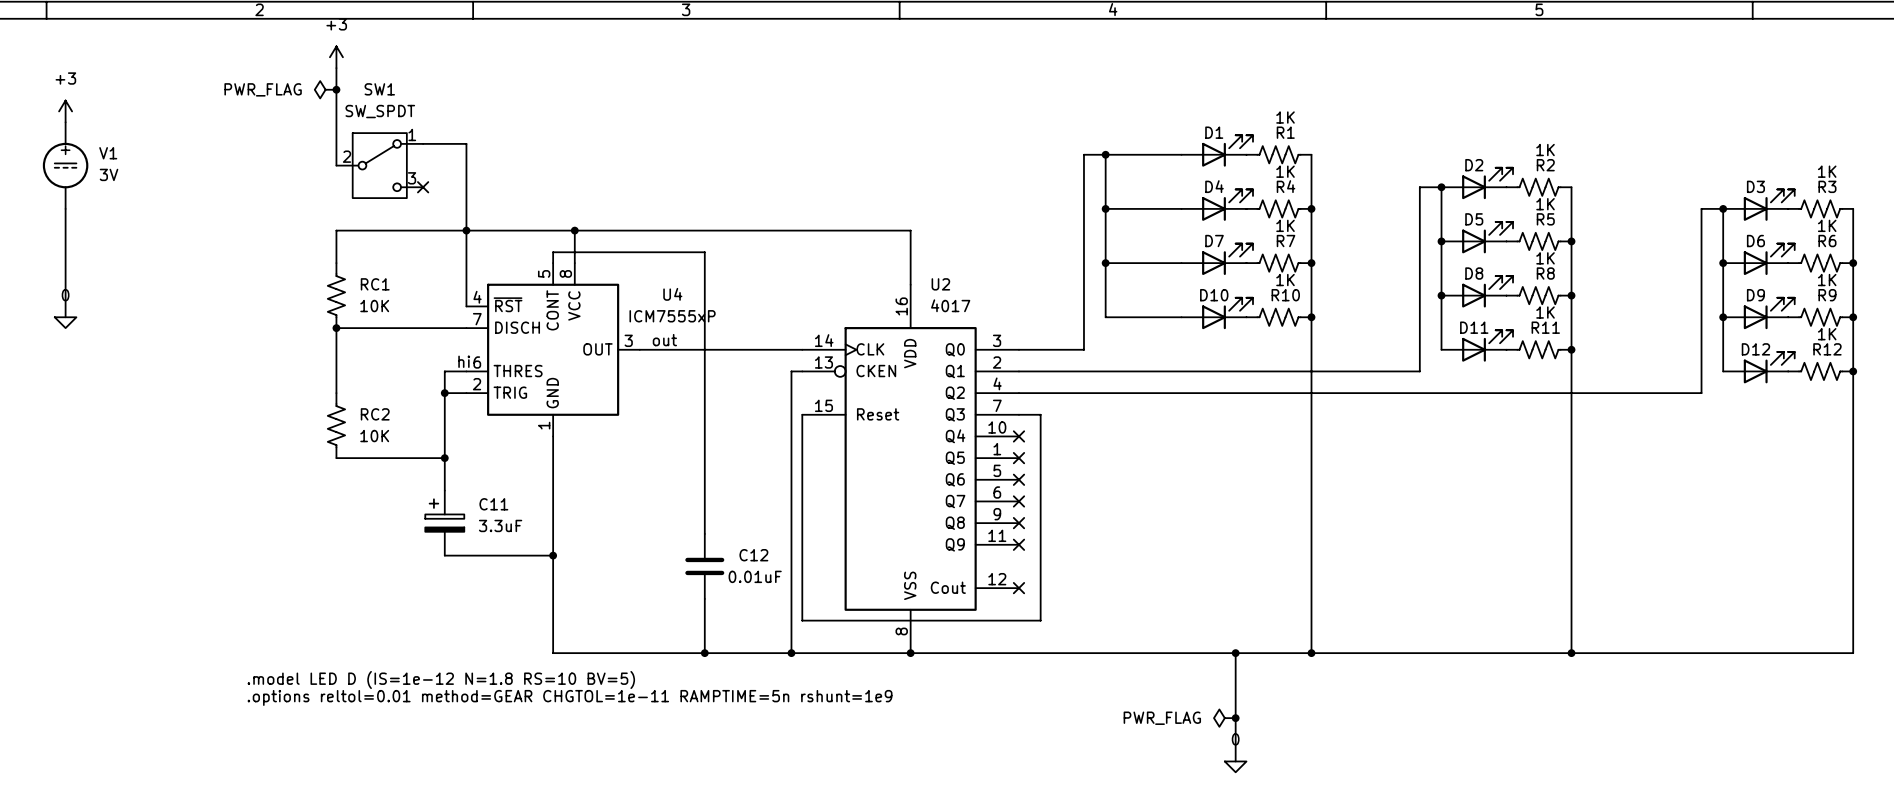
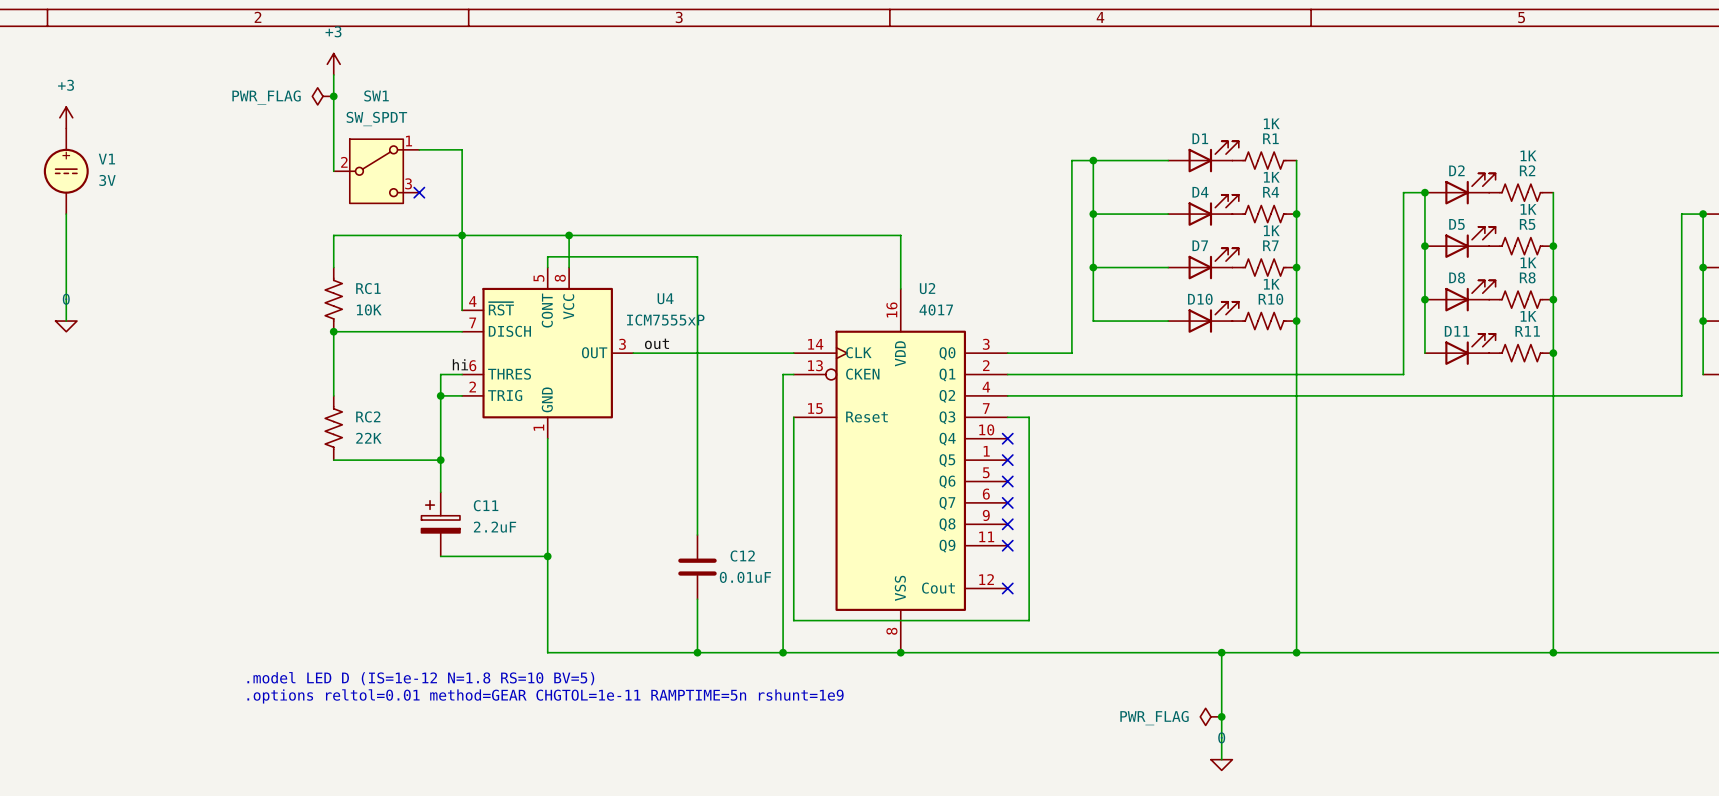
RC2 value: 10K (374, 436) -> 22K (368, 438)
C11 value: 3.3uF (500, 525) -> 2.2uF (495, 527)

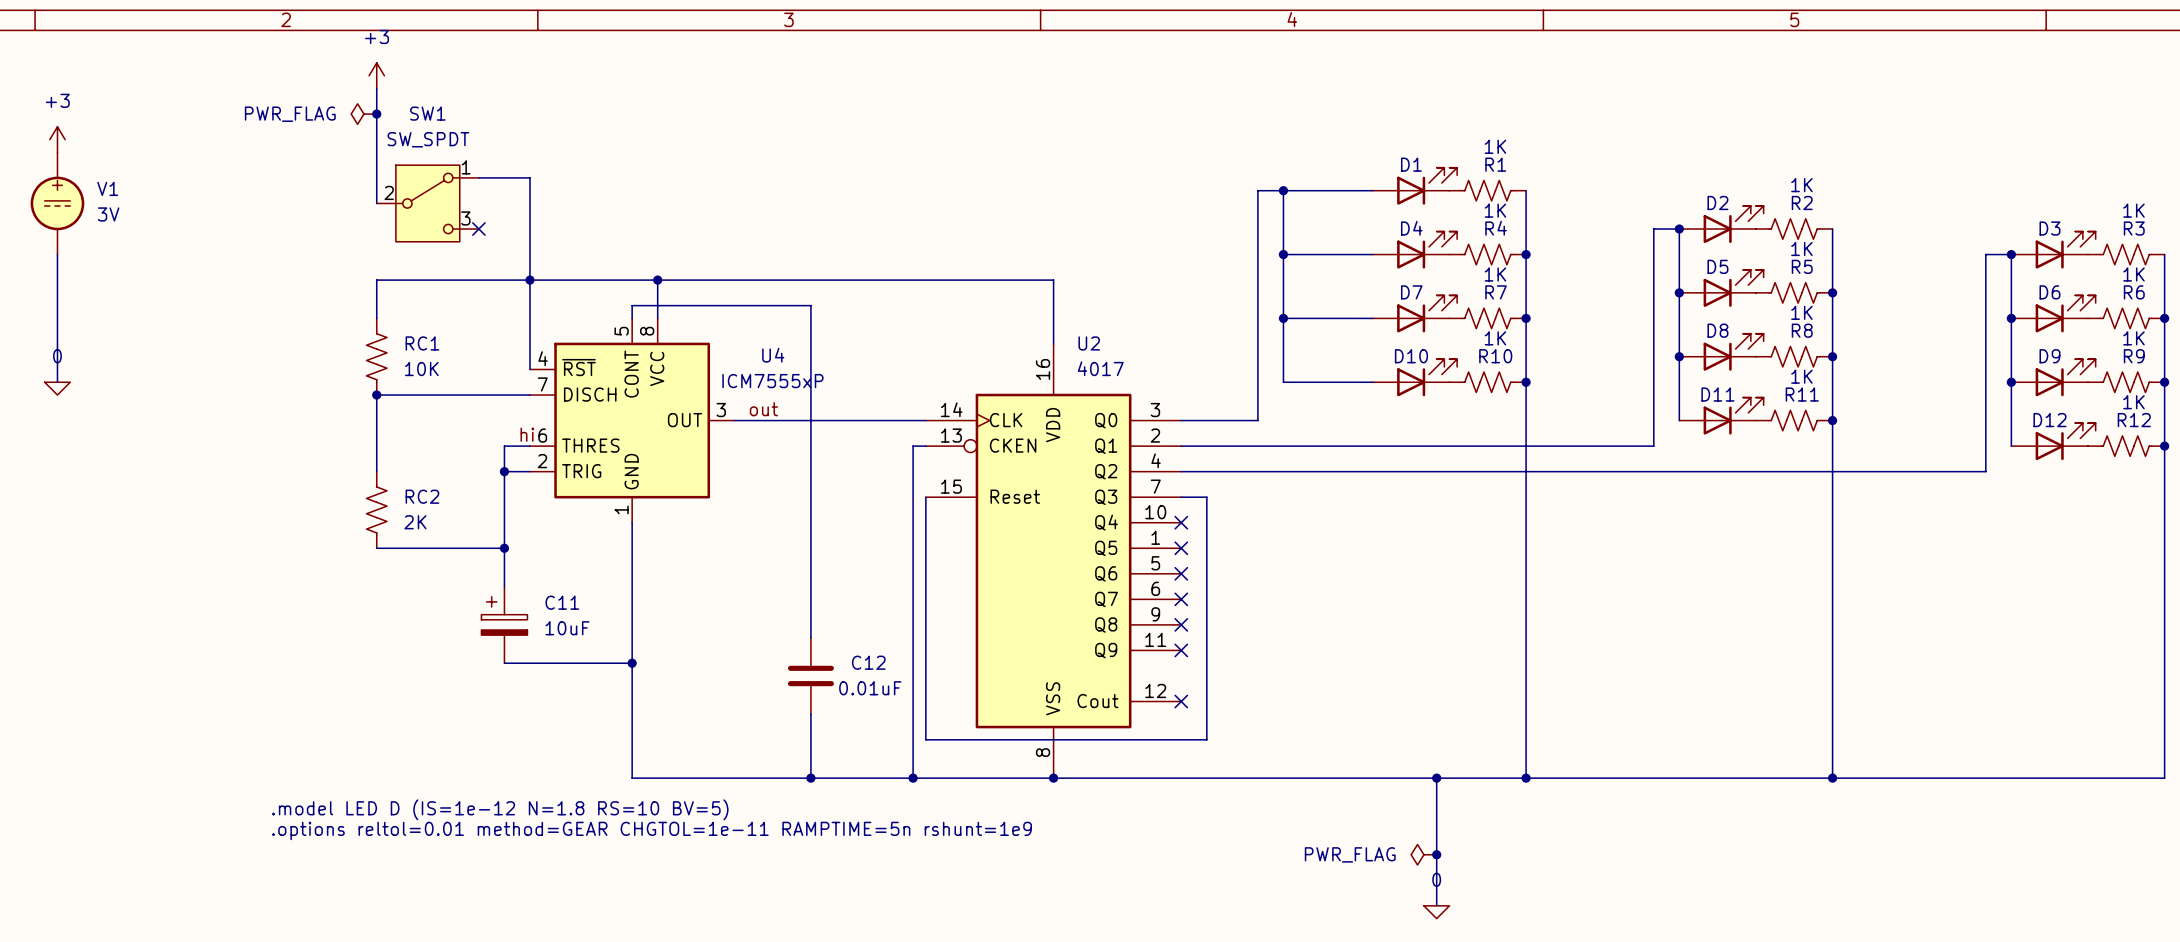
RC2 value: 22K (368, 438) -> 2K (415, 522)
C11 value: 2.2uF (495, 527) -> 10uF (567, 628)

